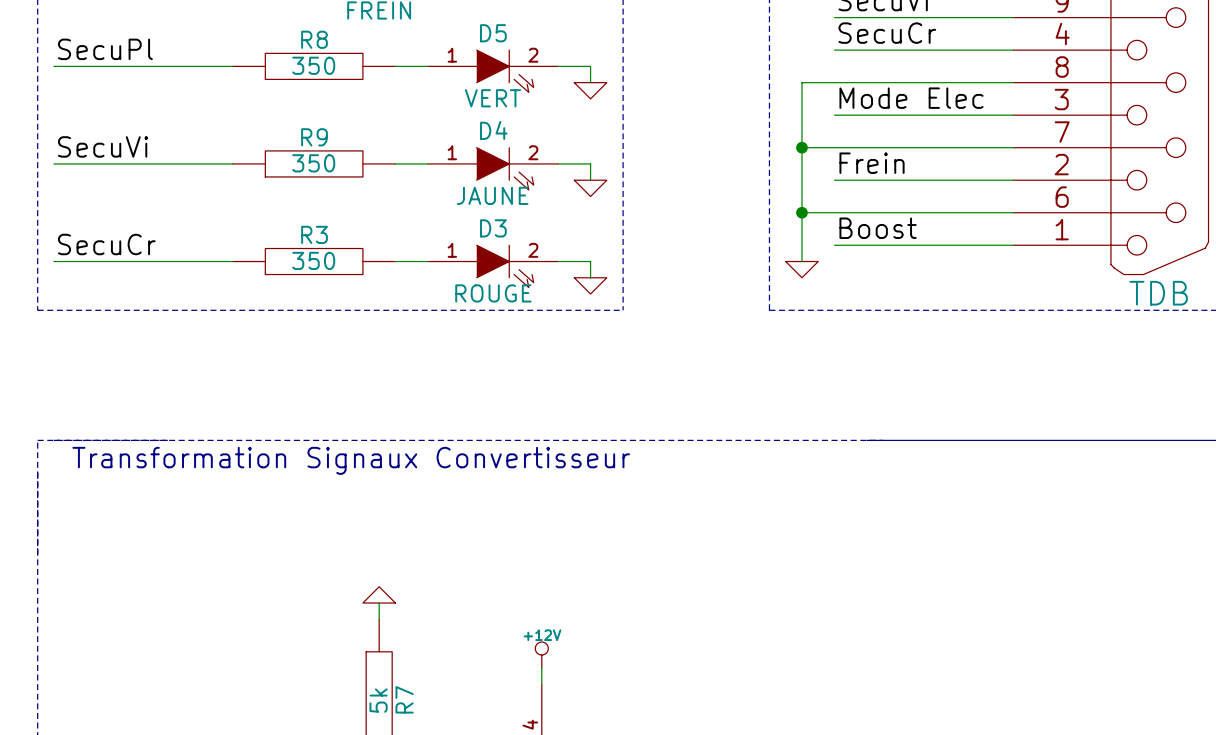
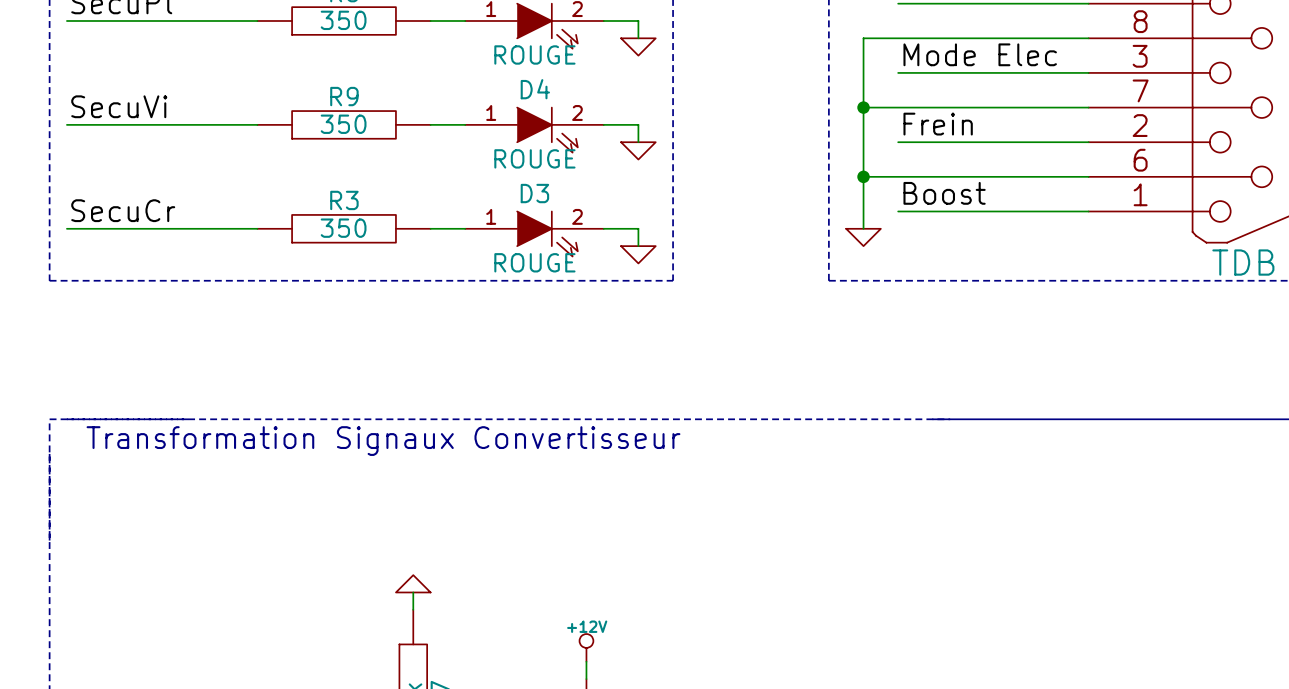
D5 value: VERT (493, 98) -> ROUGE (534, 54)
D4 value: JAUNE (492, 195) -> ROUGE (534, 158)

